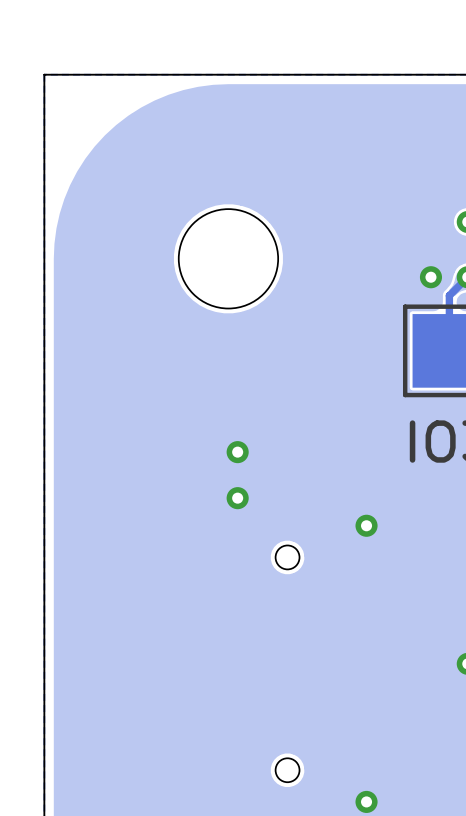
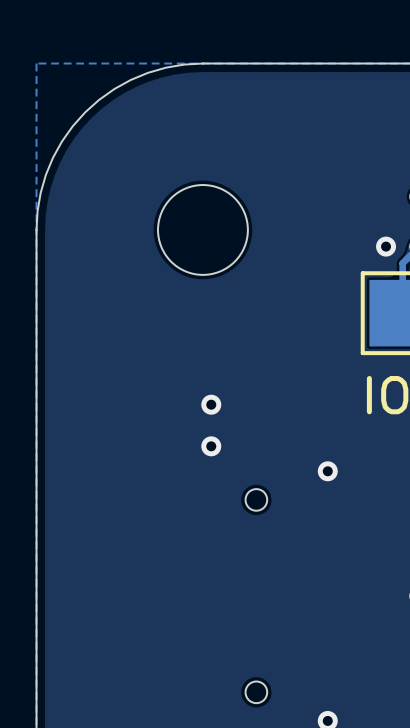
board edge: (228, 74) (44, 74) (44, 258) -> (202, 63) (165, 67) (130, 80) (99, 99) (85, 112) (62, 141) (53, 157) (40, 192) (36, 229)

